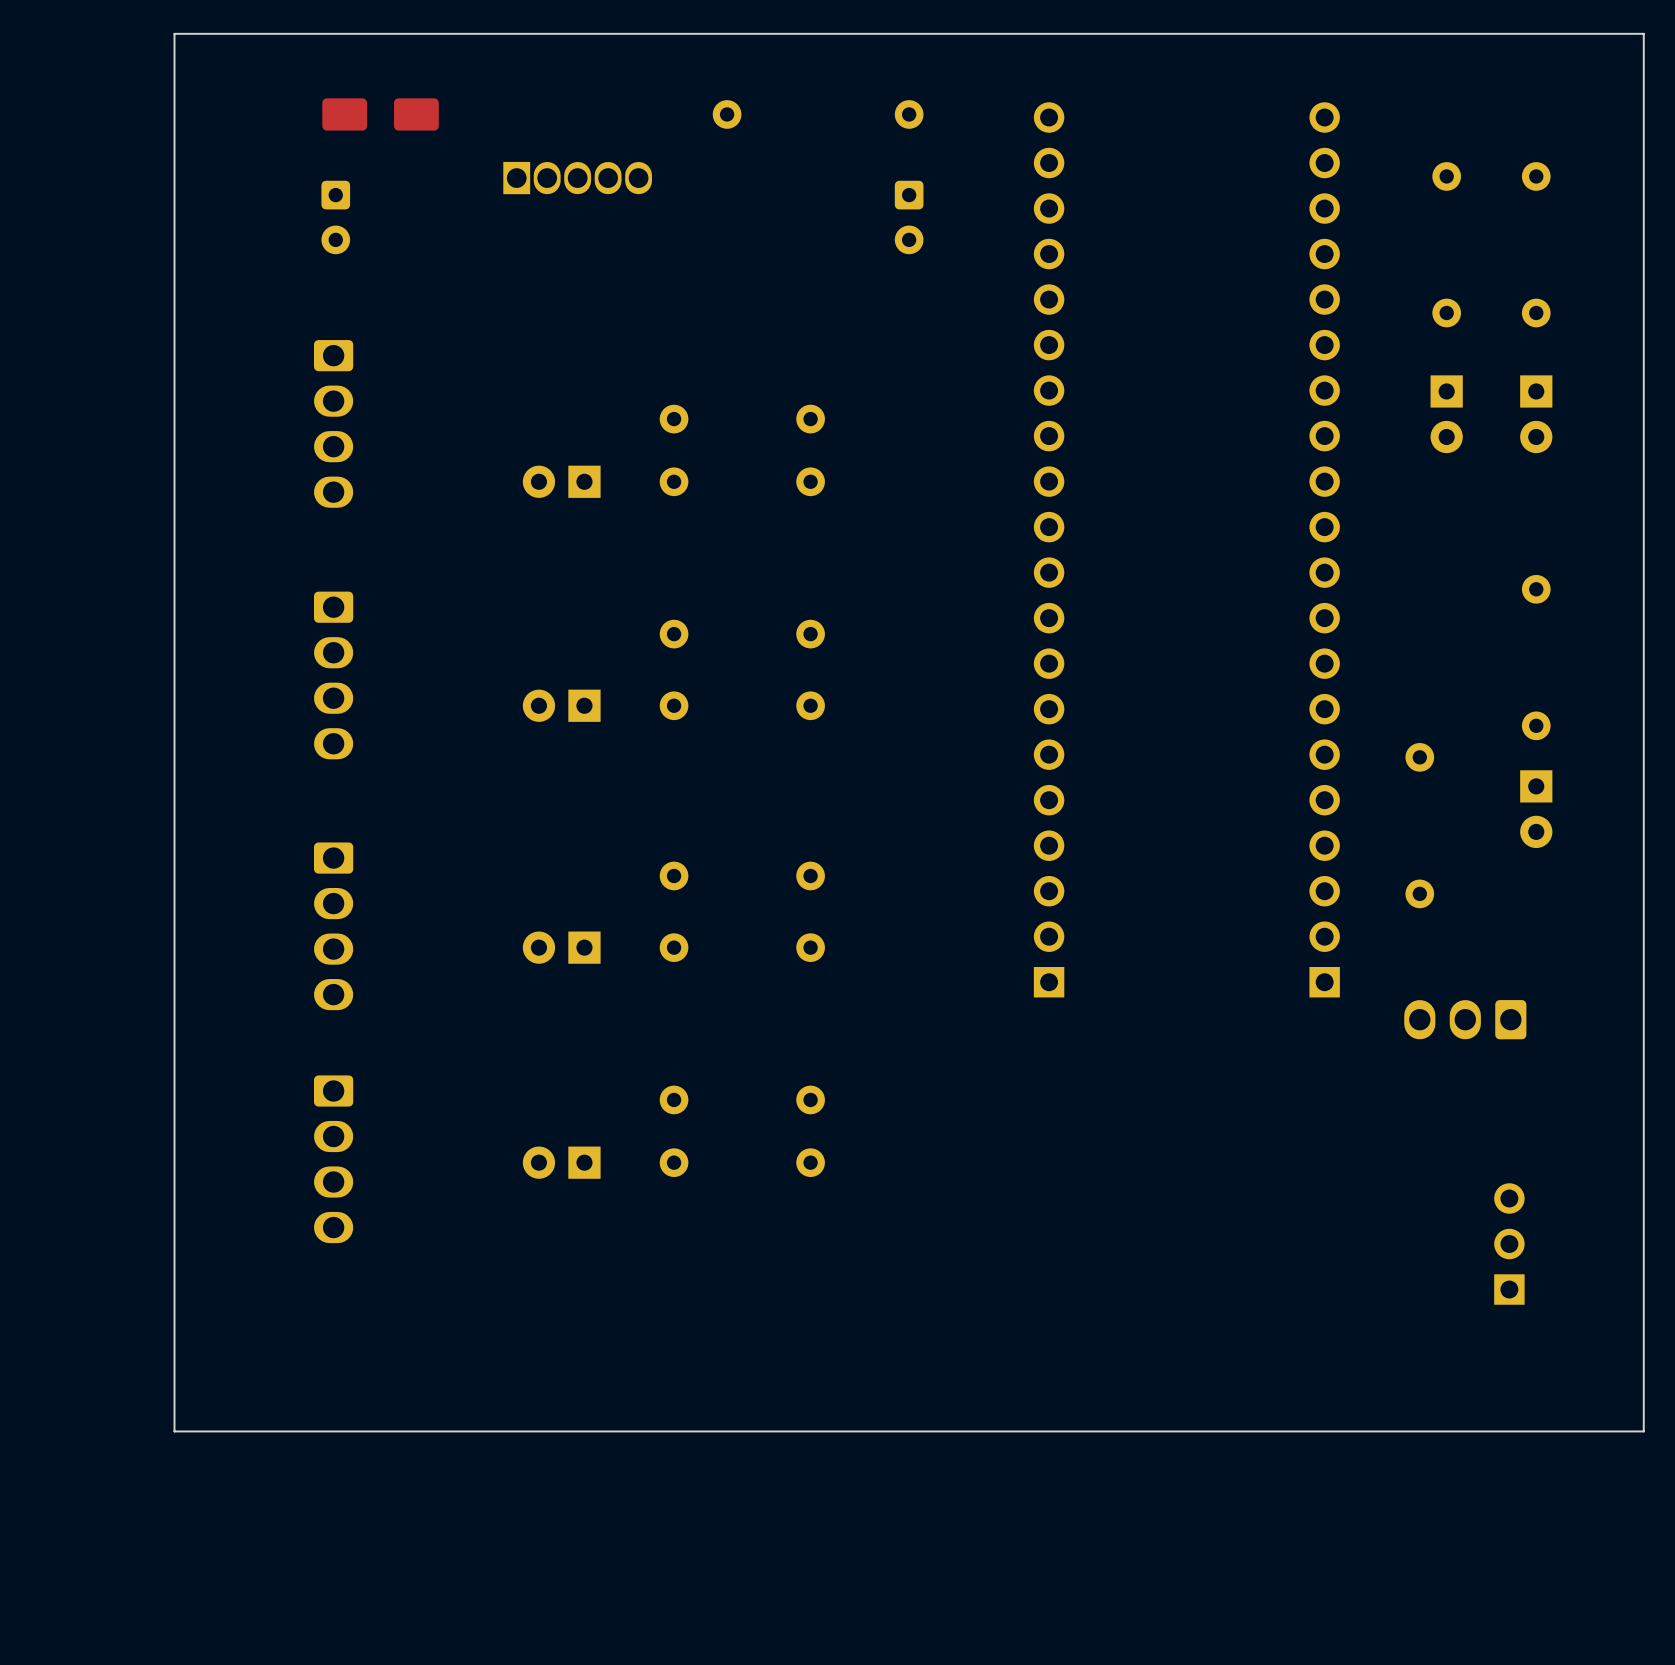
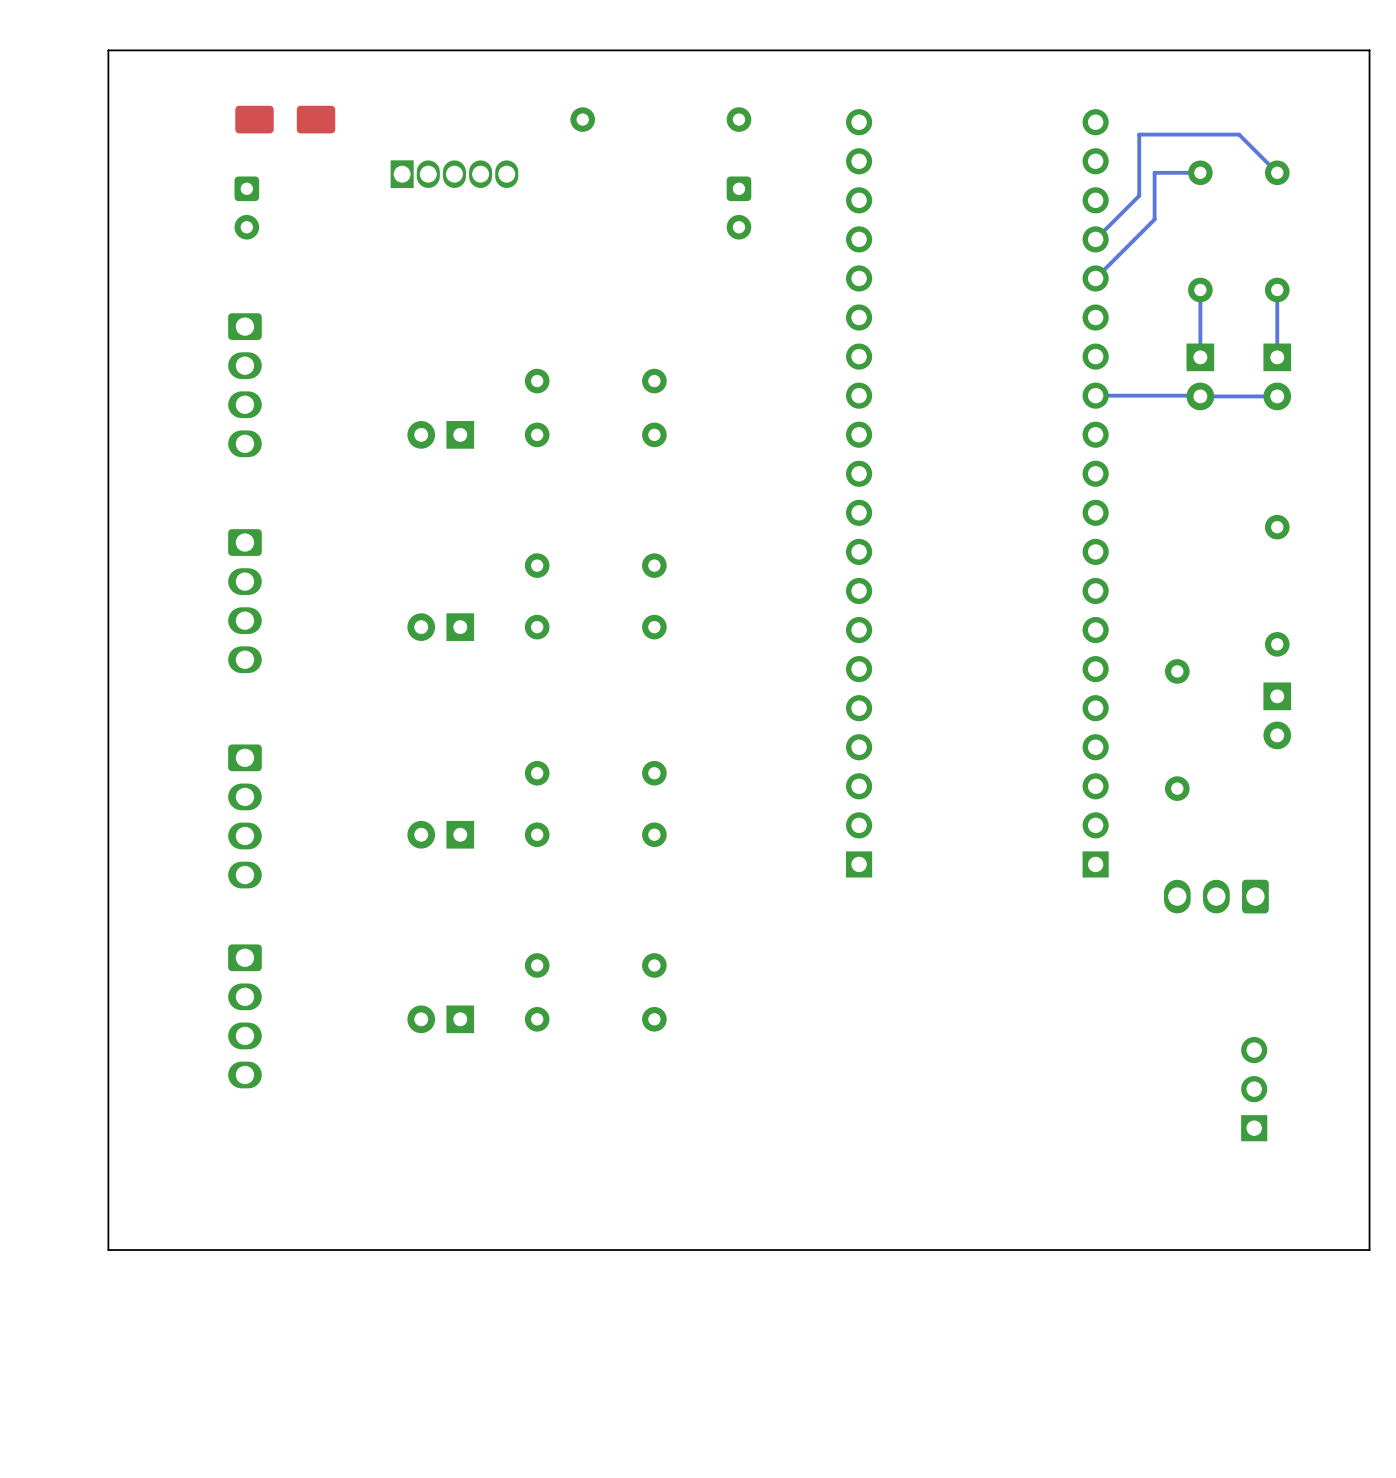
bottom track: none -> (1200, 172) (1154, 173) (1154, 219) (1095, 278)
bottom track: none -> (1277, 172) (1239, 134) (1139, 134) (1139, 195) (1095, 239)
bottom track: none -> (1200, 289) (1200, 357)
bottom track: none -> (1277, 289) (1277, 357)
bottom track: none -> (1095, 395) (1277, 396)

